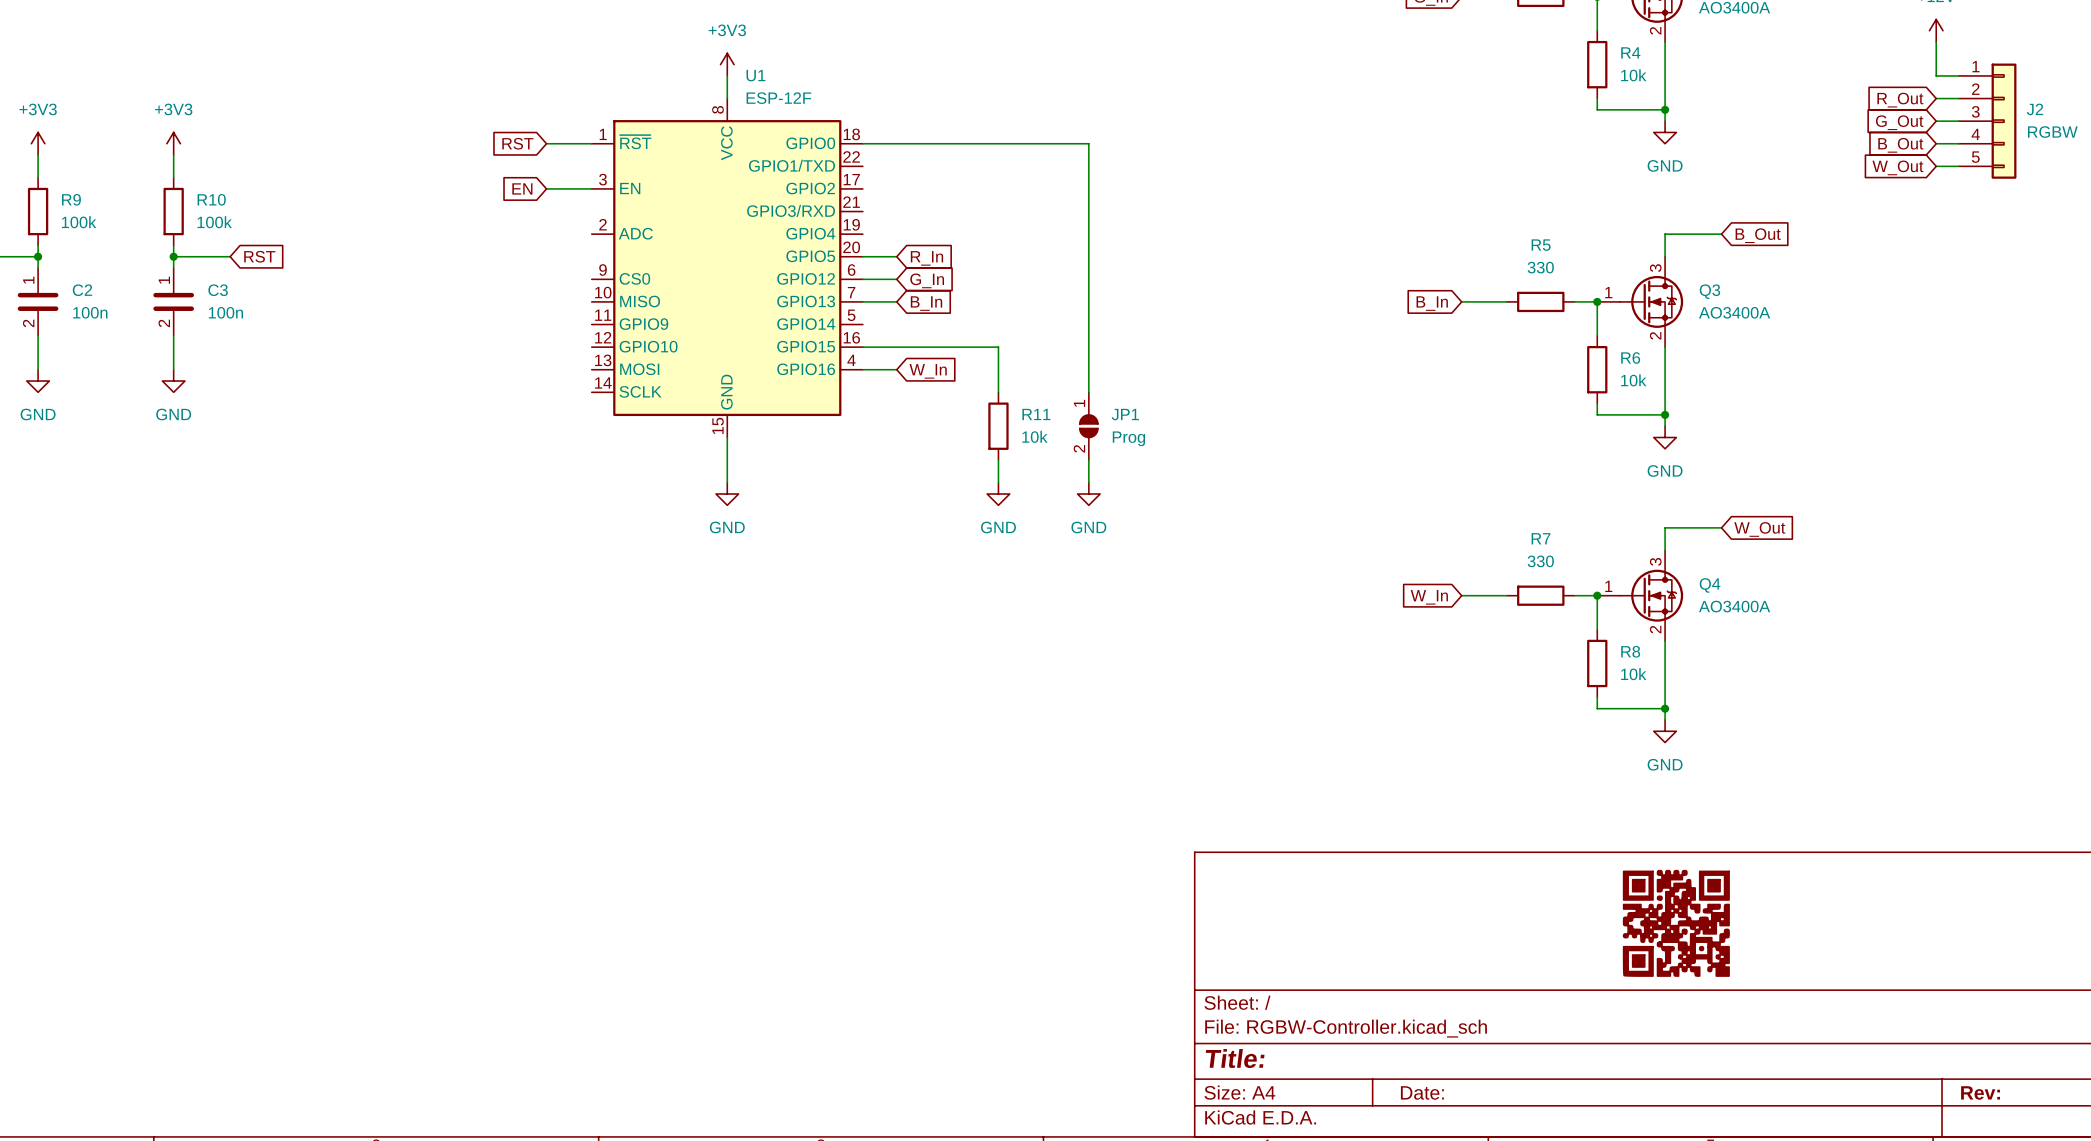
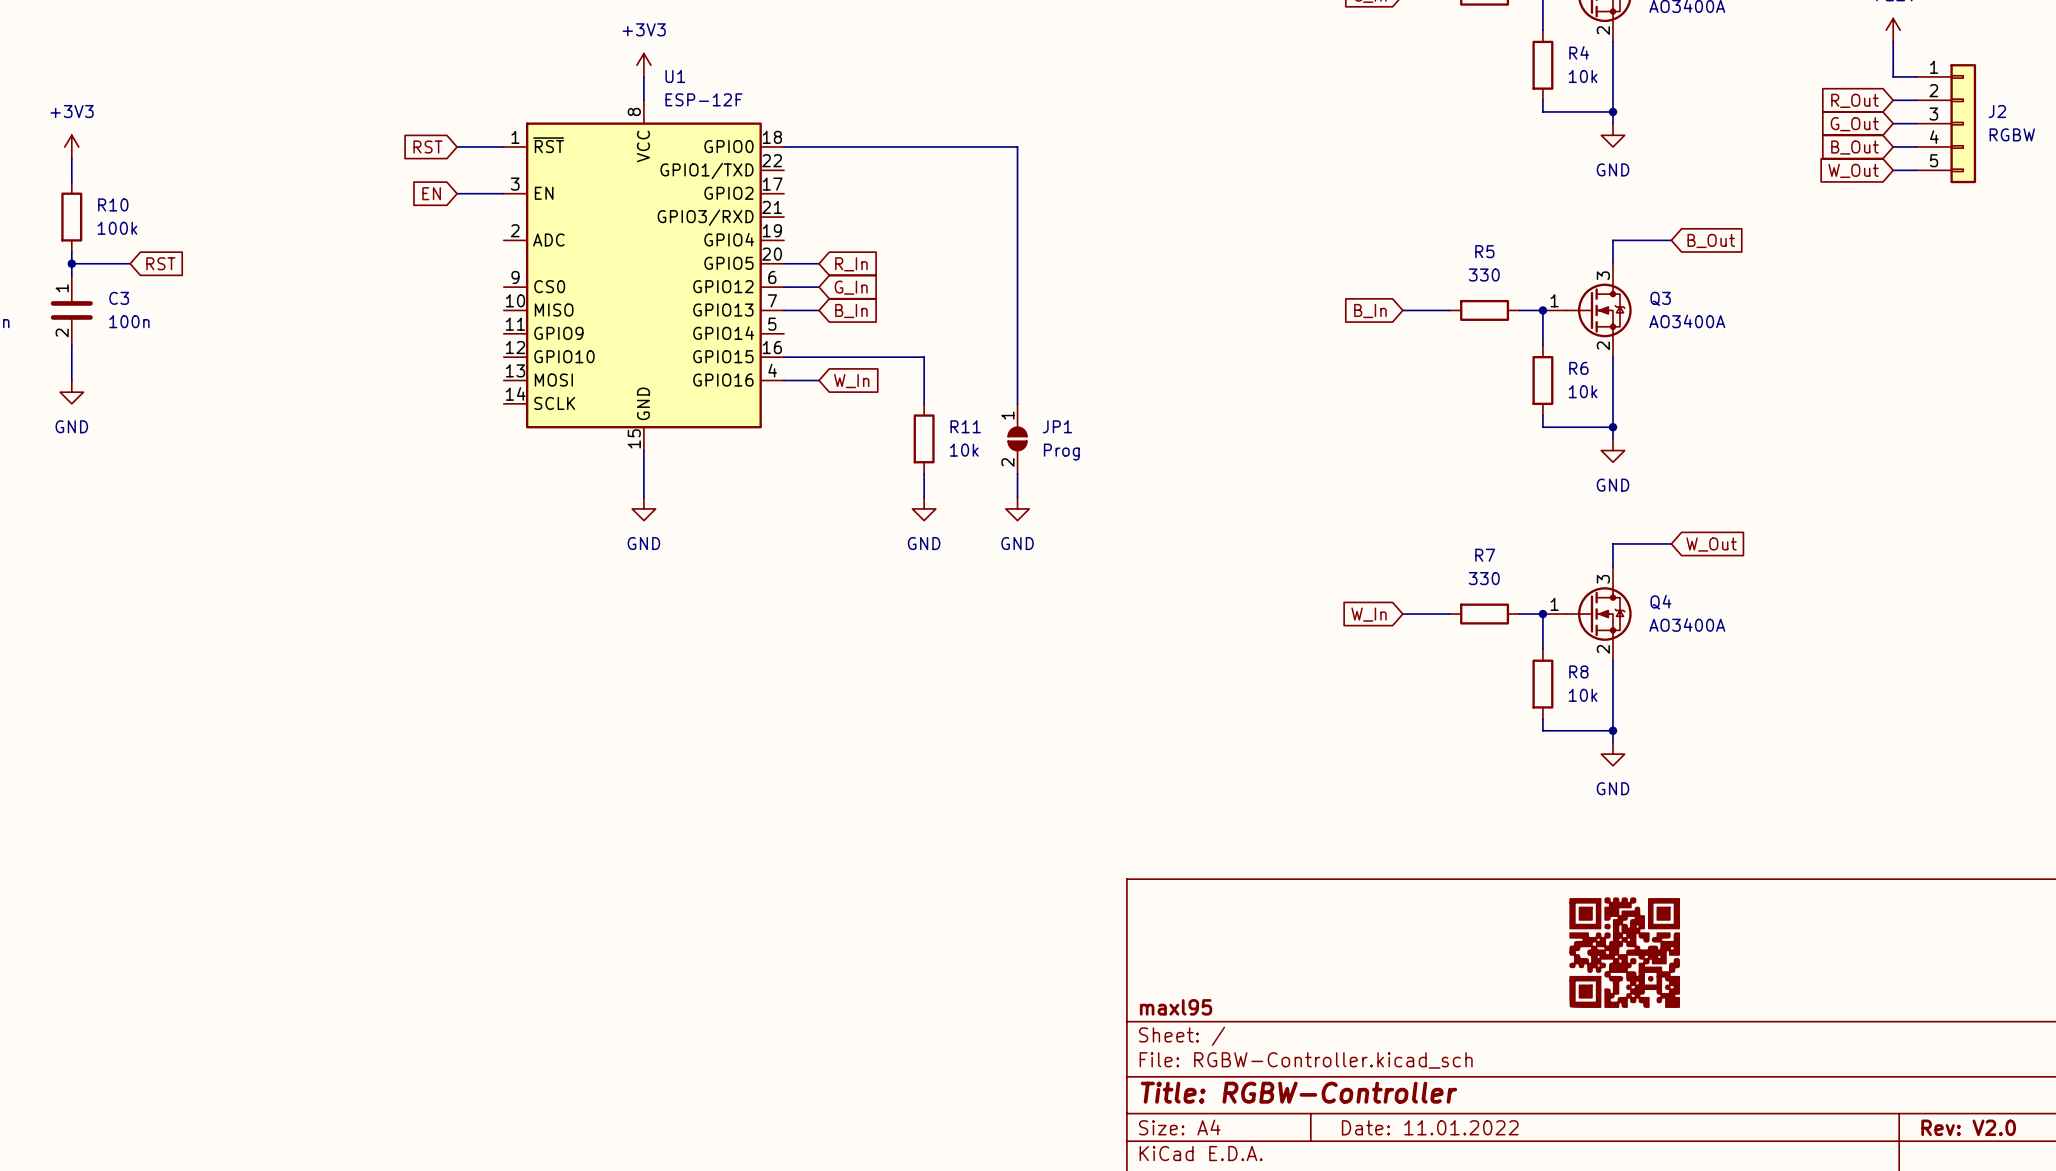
title block: none -> maxl95 (1176, 1007)
title block: Title: (1235, 1058) -> Title: RGBW-Controller (1298, 1092)
title block: Date: (1422, 1092) -> Date: 11.01.2022 (1430, 1127)
title block: Rev: (1980, 1092) -> Rev: V2.0 (1968, 1127)

